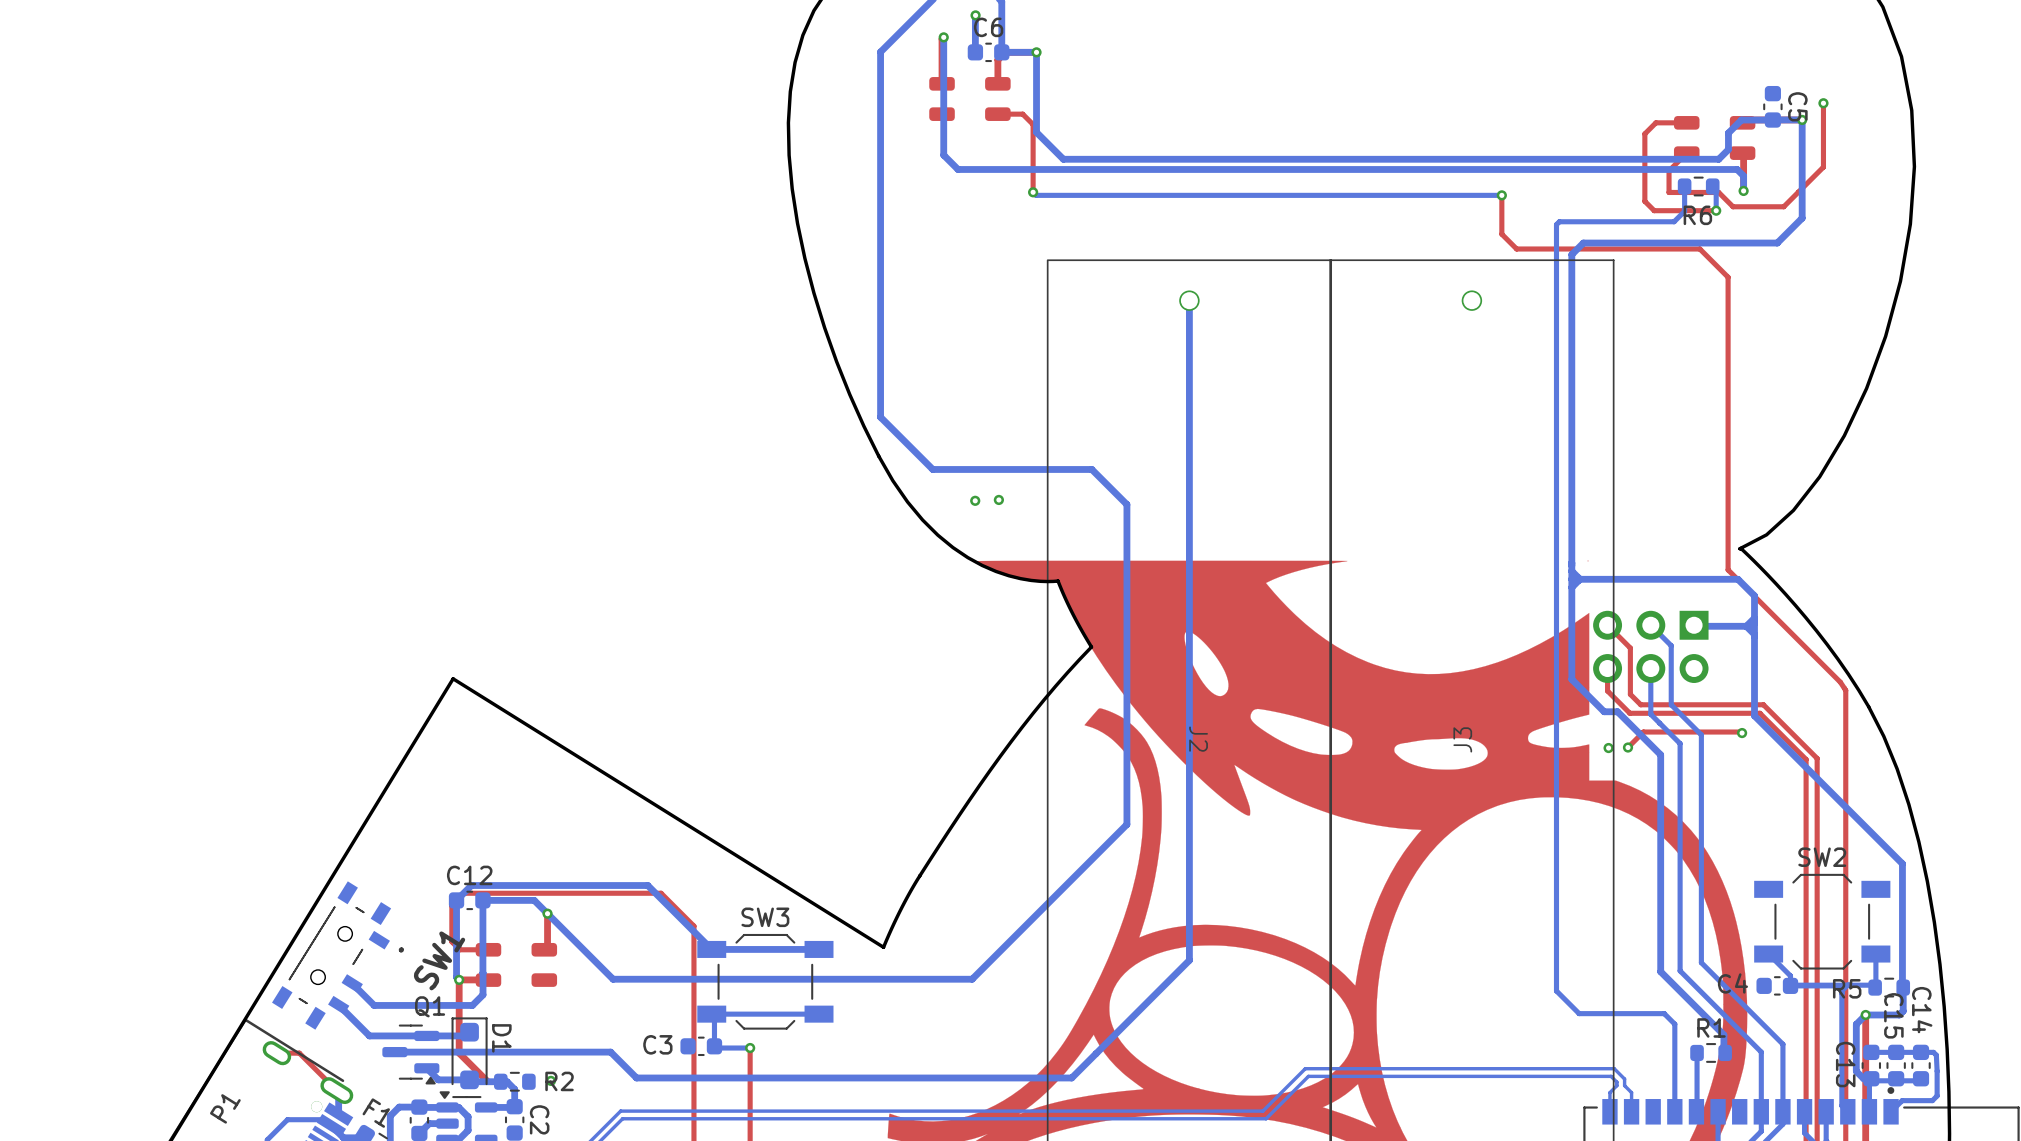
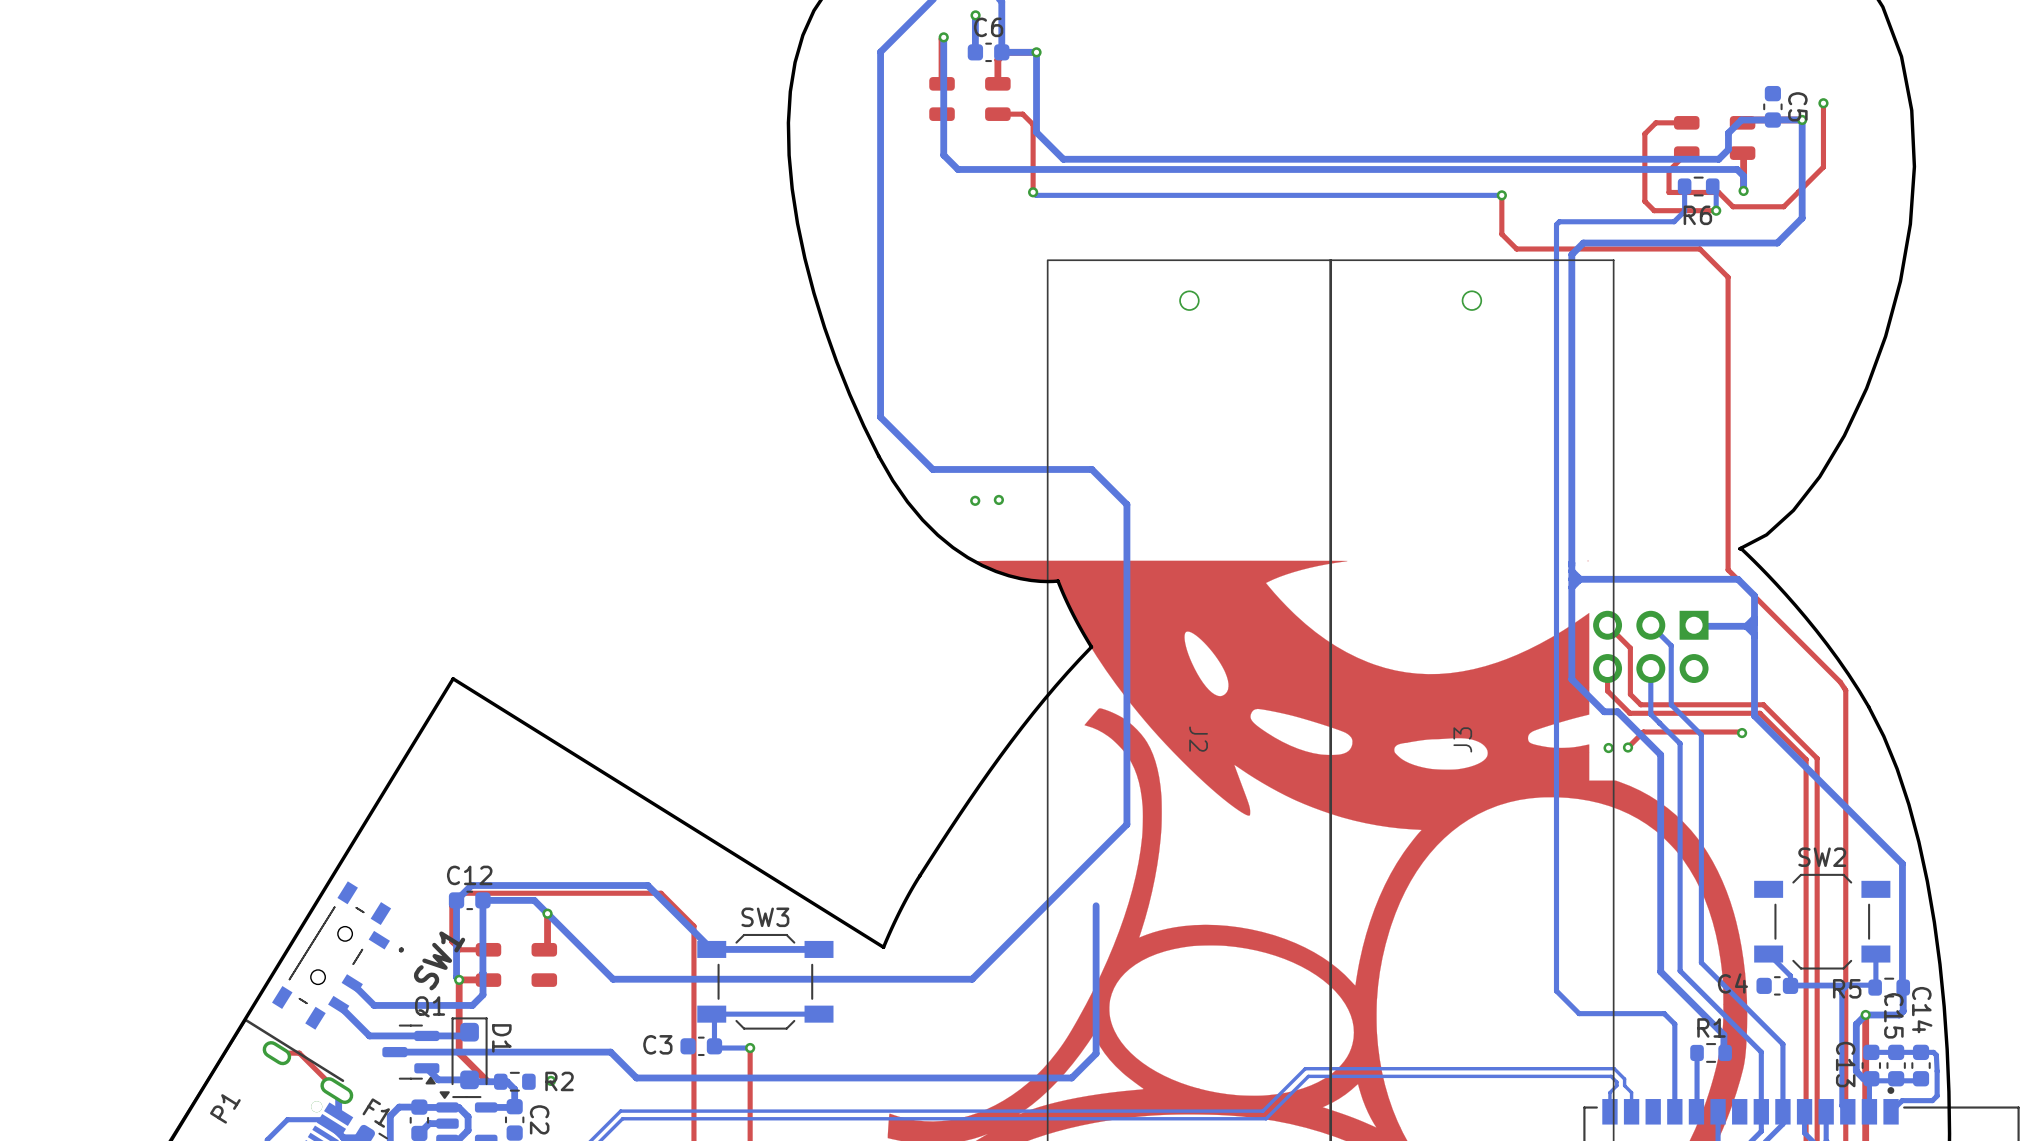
bottom track: (1189, 300) (1189, 960) (1096, 1053) -> (1096, 905) (1096, 1053)

